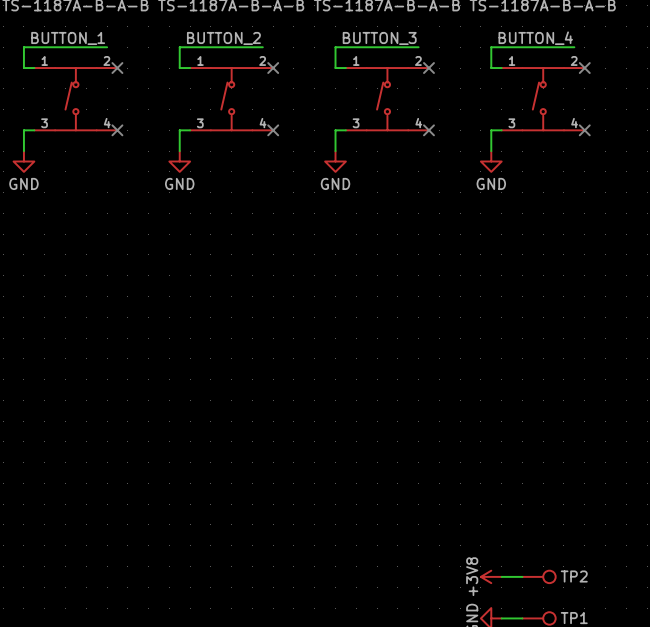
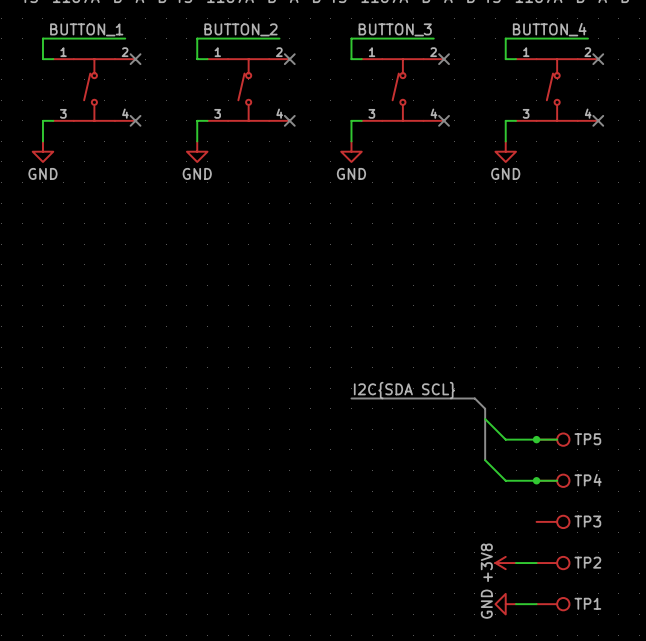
label: none -> I2C{SDA SCL} (404, 390)
bus: none -> (351, 398) (474, 398) (485, 408) (485, 460)
wire: none -> (485, 419) (505, 439) (557, 439)
junction: none -> (536, 439)
TP5: none -> (553, 439)
wire: none -> (485, 460) (505, 480) (557, 480)
junction: none -> (536, 480)
TP4: none -> (553, 480)
TP3: none -> (553, 521)

